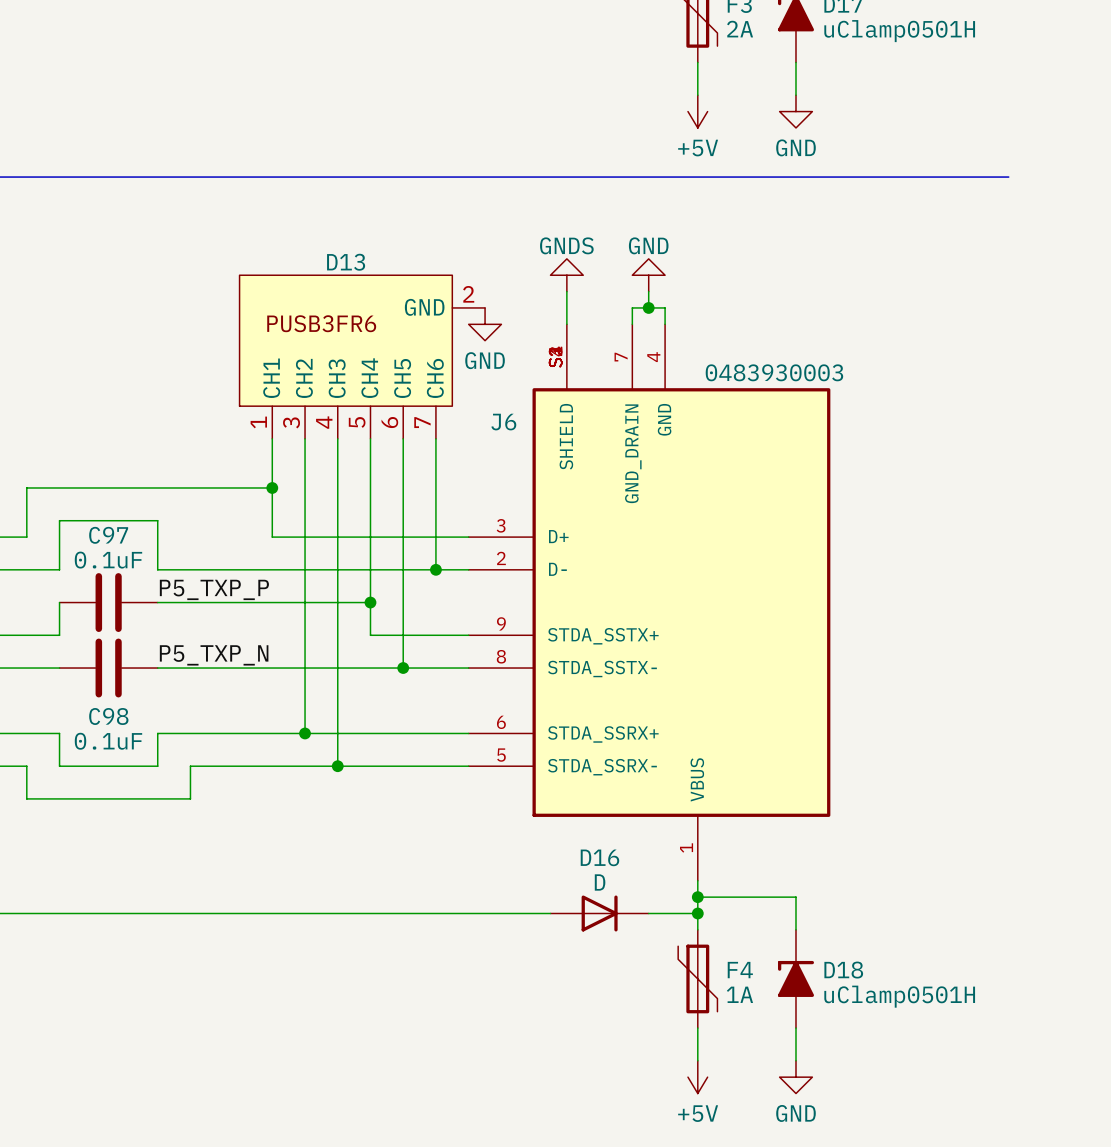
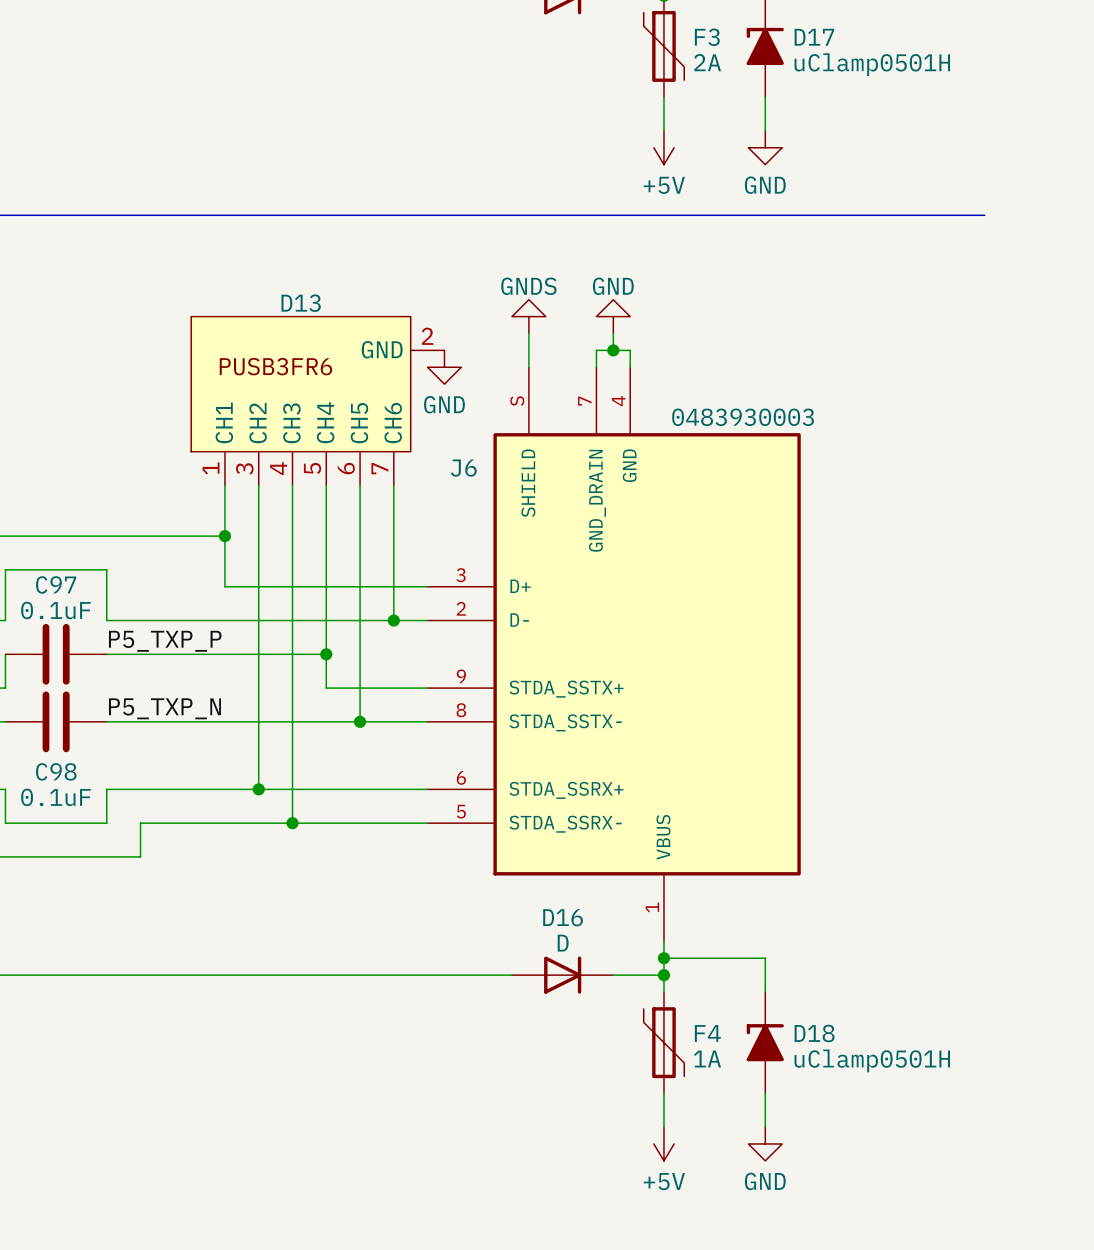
J6 symbol: [468, 324, 831, 881] -> [427, 367, 801, 942]

